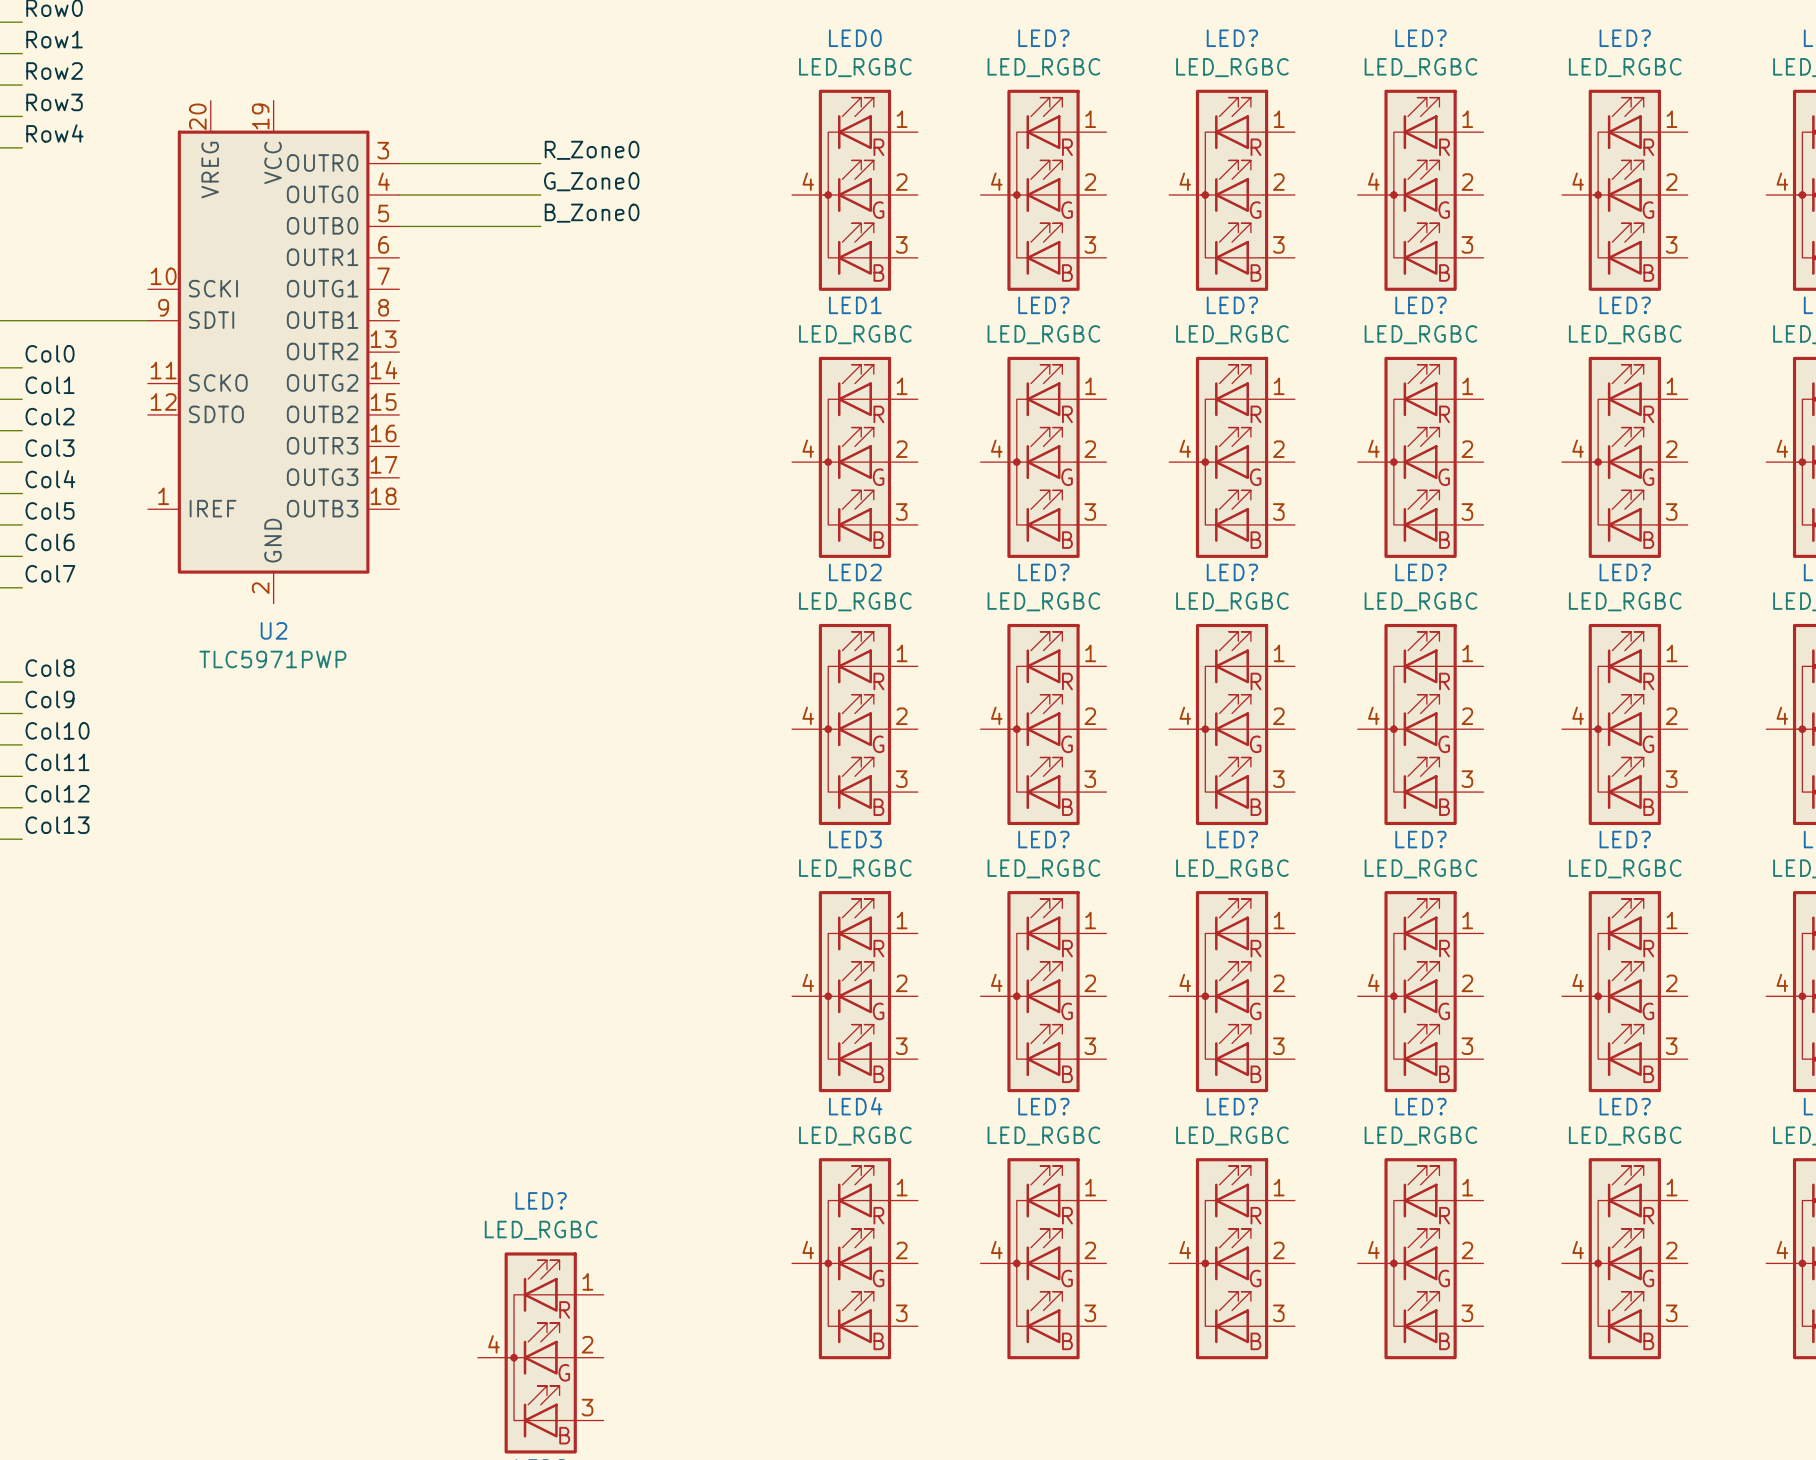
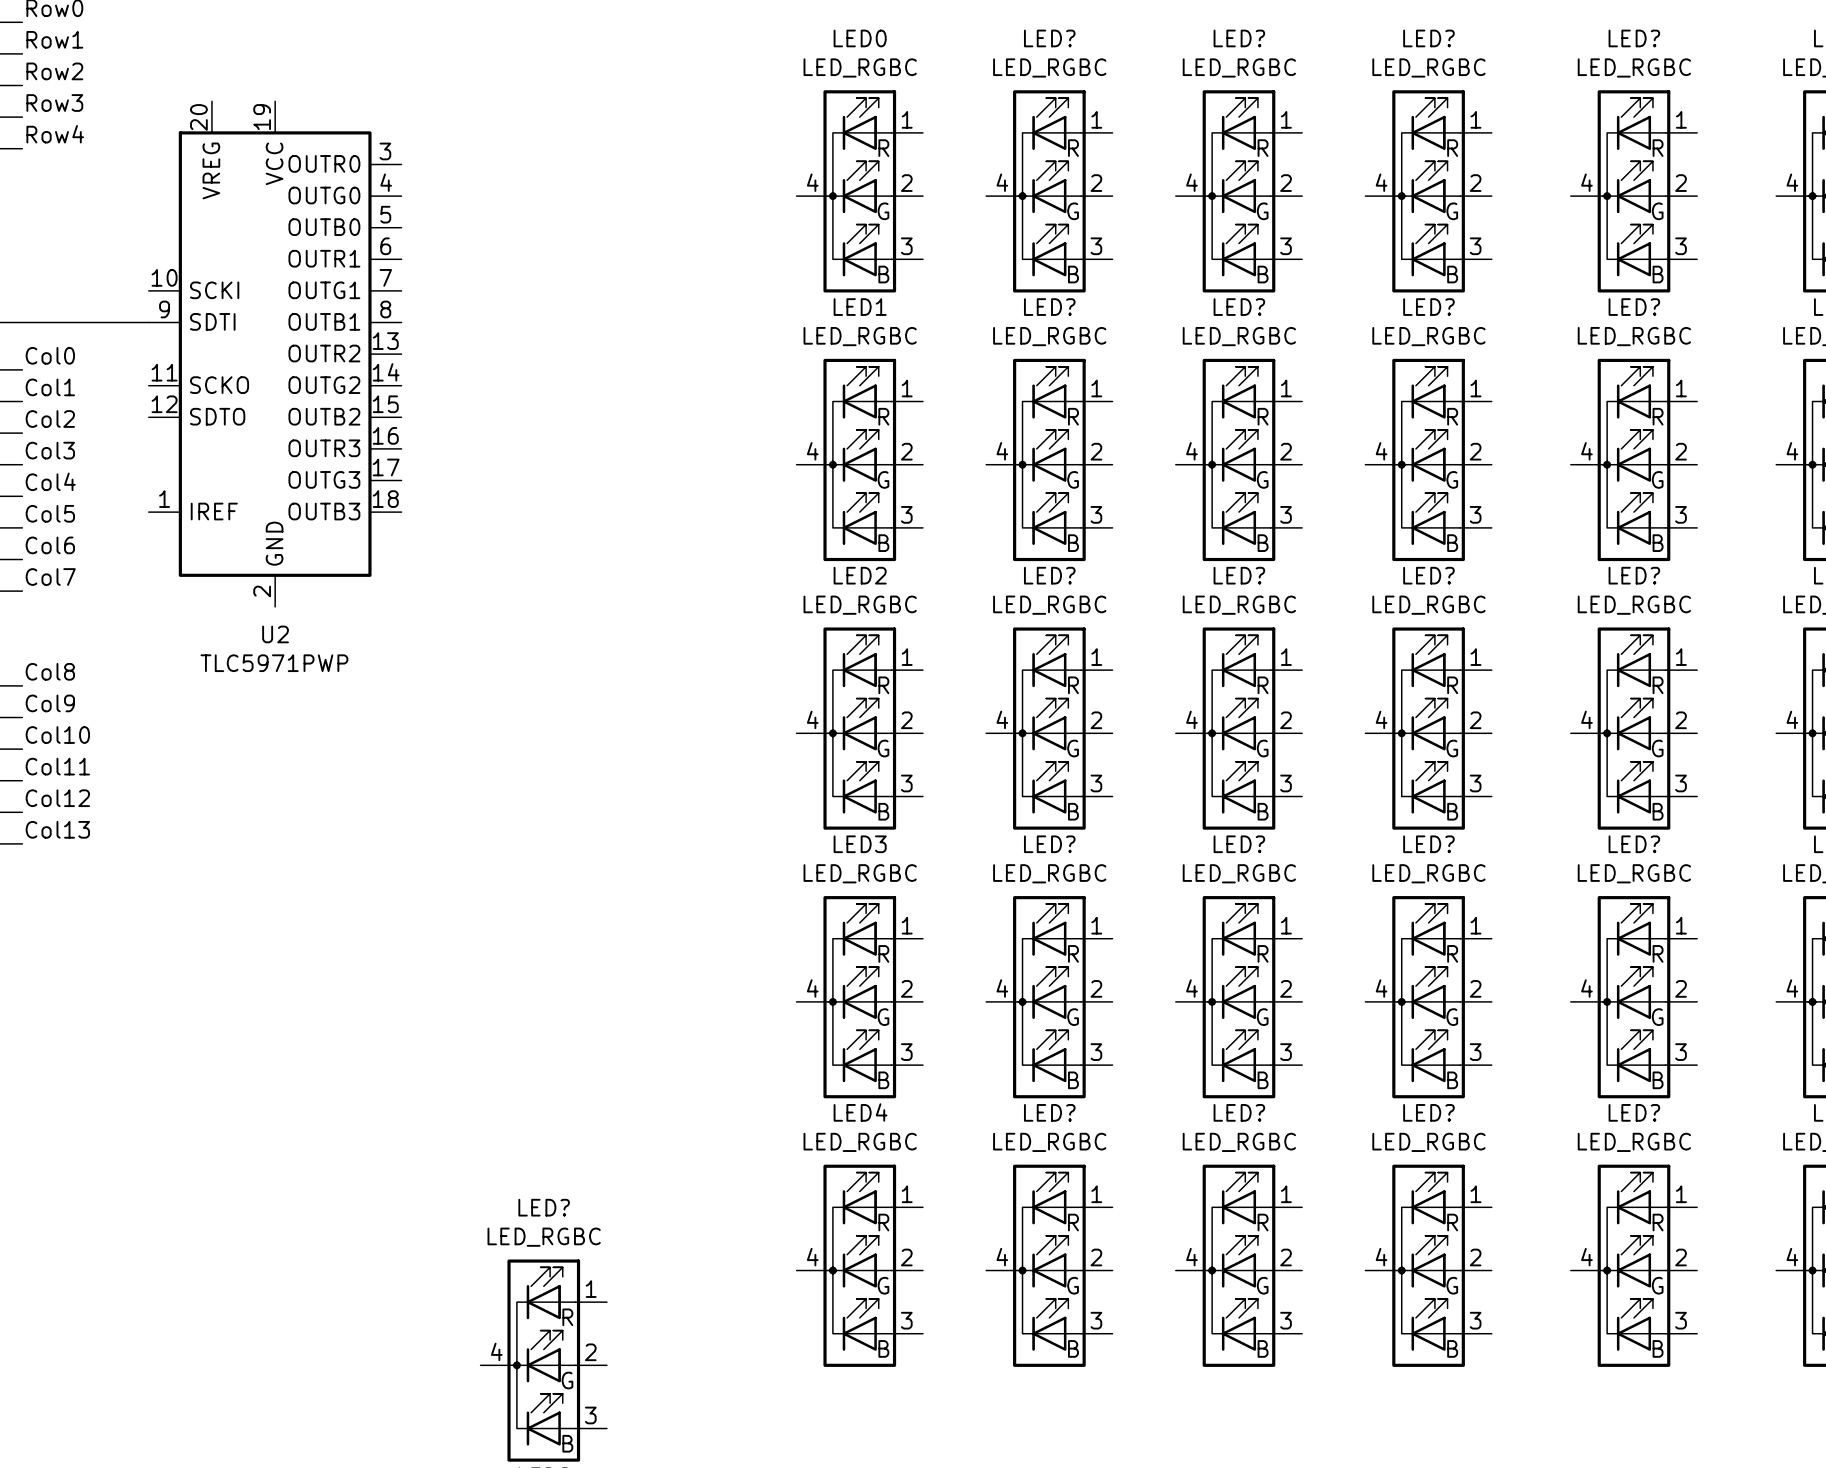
label: R_Zone0 (592, 150) -> none
wire: (399, 163) (540, 163) -> none
label: G_Zone0 (591, 181) -> none
wire: (399, 195) (540, 195) -> none
label: B_Zone0 (592, 213) -> none
wire: (399, 226) (540, 226) -> none

